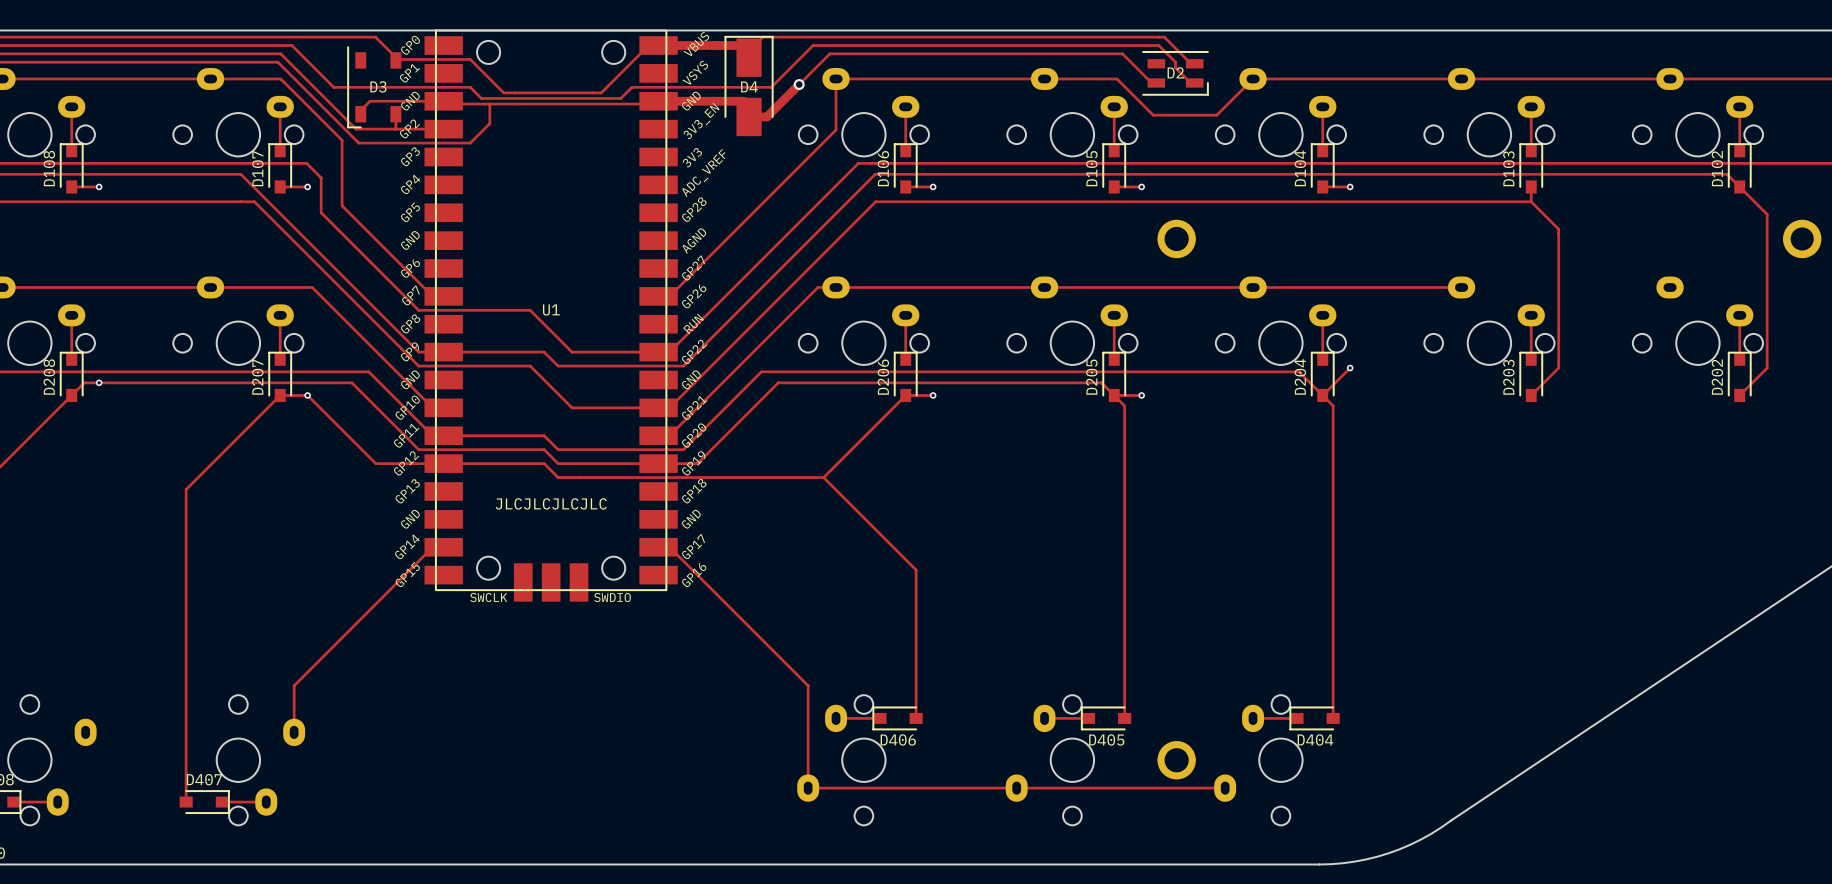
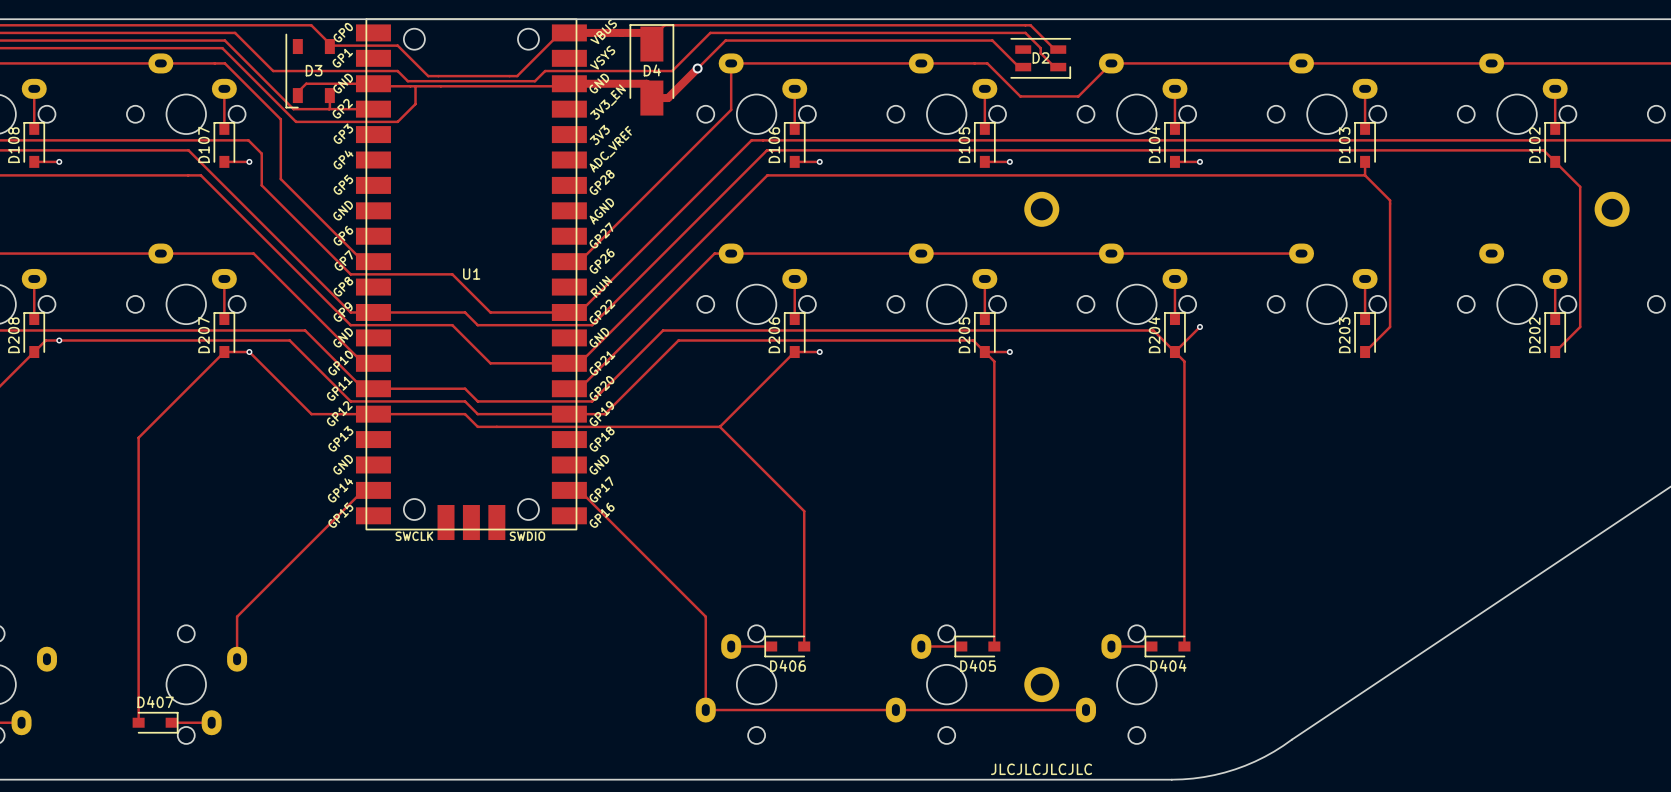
text: JLCJLCJLCJLC (551, 503) -> none
text: none -> JLCJLCJLCJLC (1041, 769)

